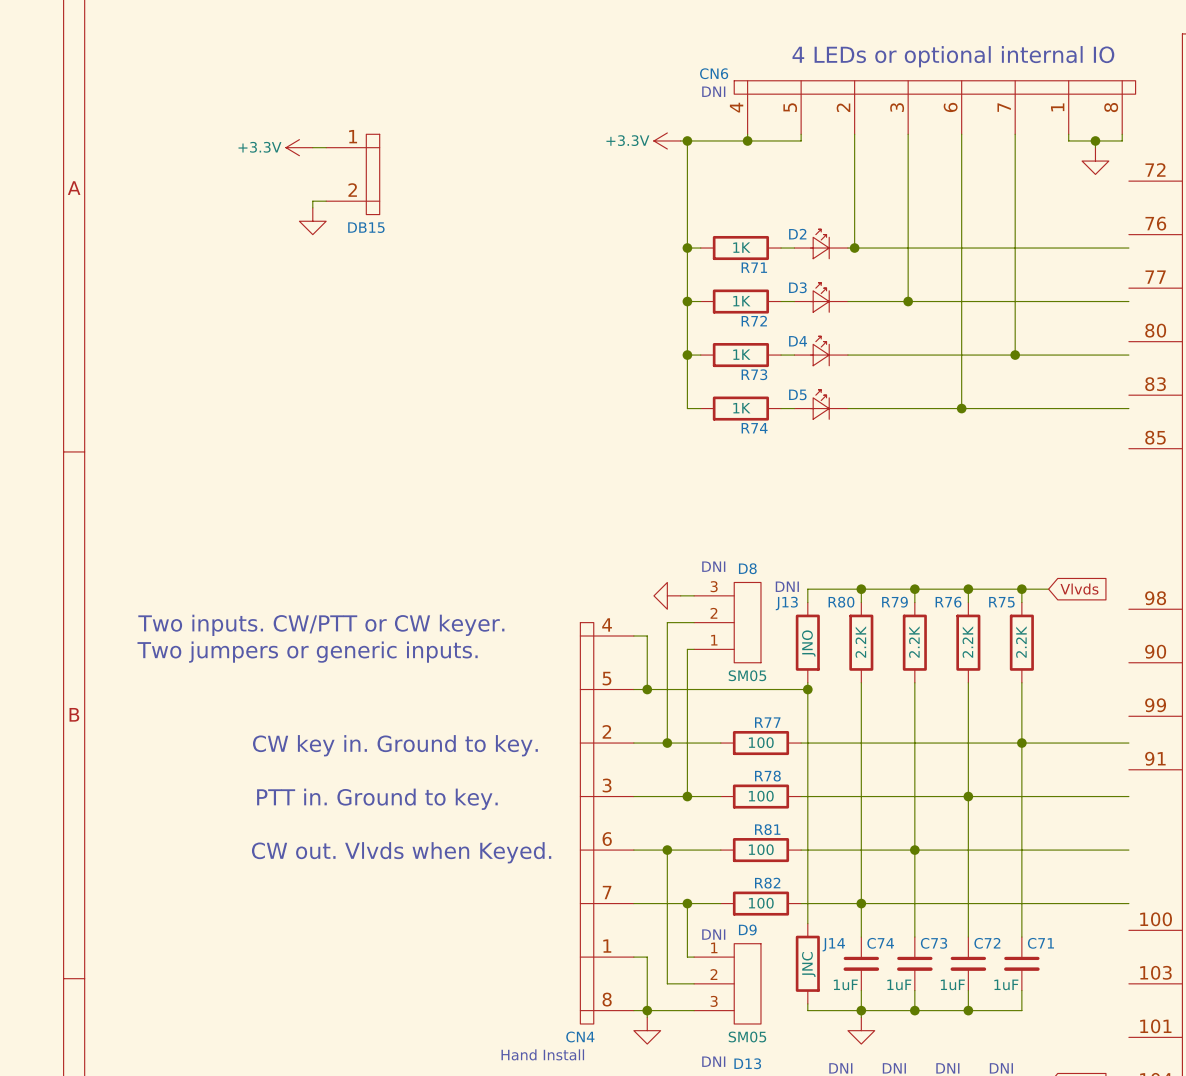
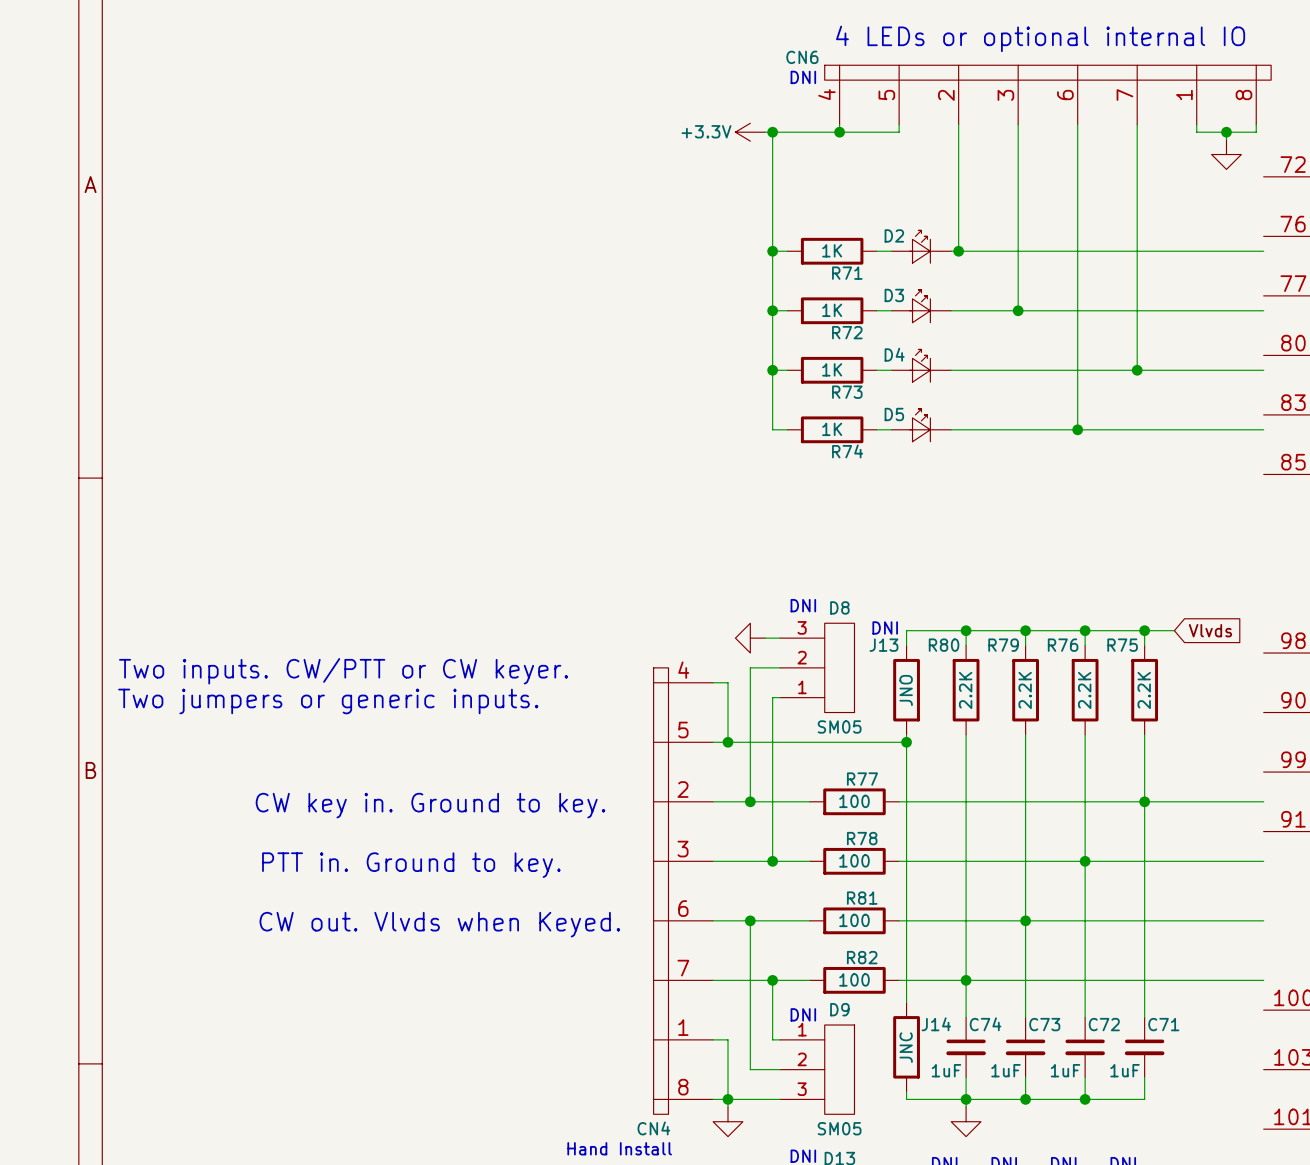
power symbol: +3.3V (299, 147) -> none
wire: (312, 147) (326, 147) -> none
DB15: (352, 174) -> none
wire: (326, 201) (312, 201) (312, 207) -> none
power symbol: (312, 221) -> none

